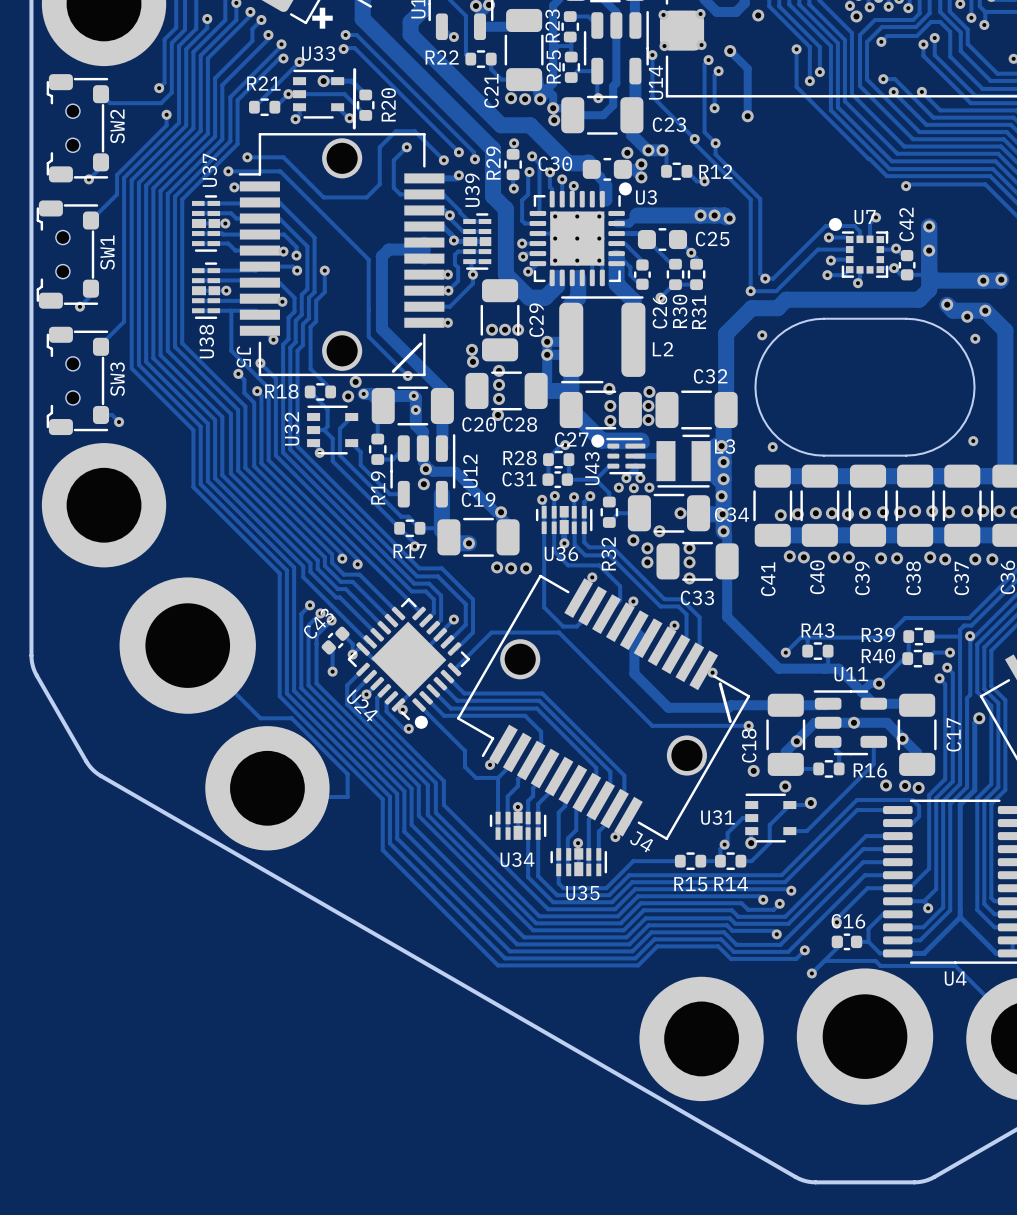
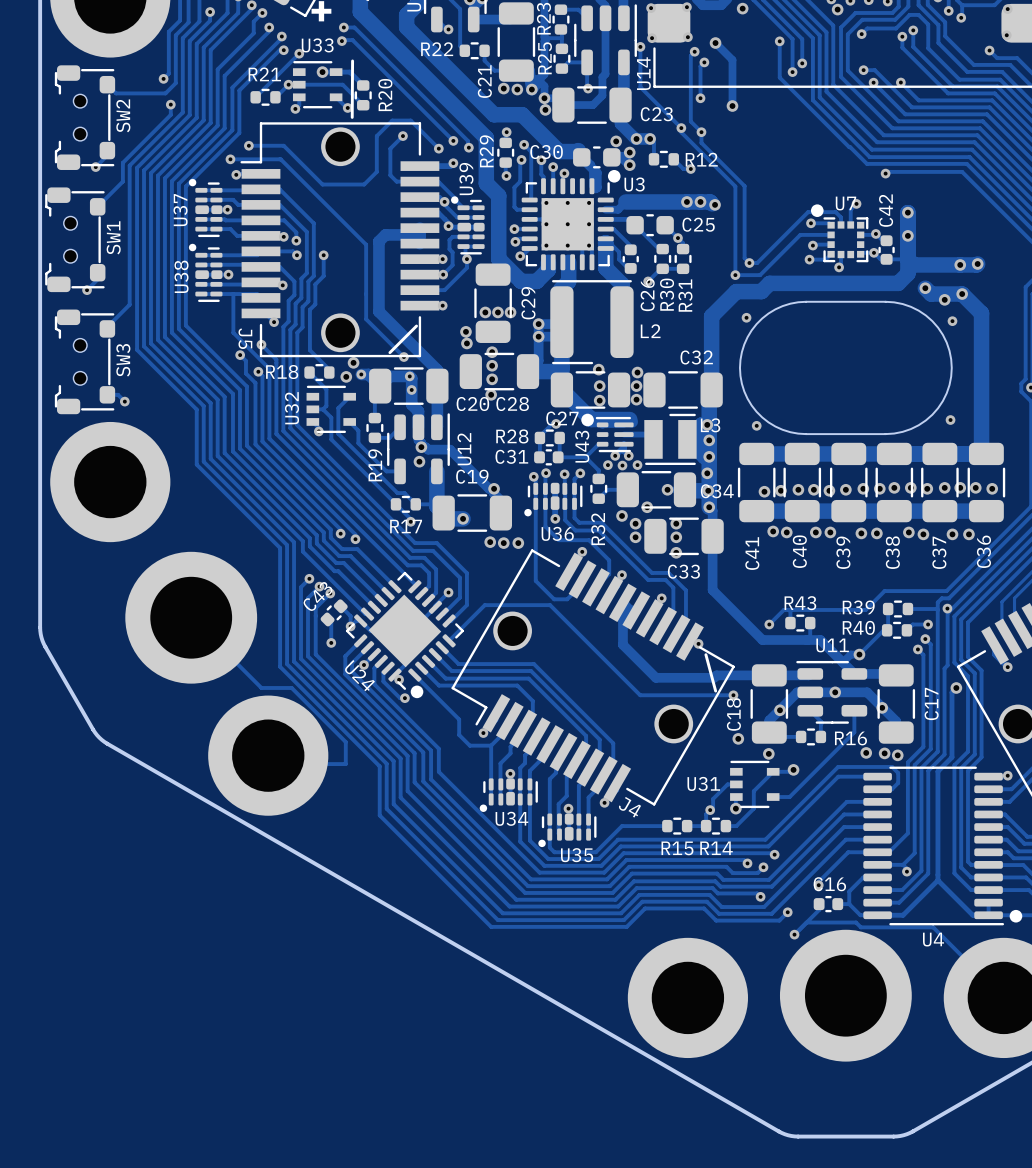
U37 name position: U37 (209, 170) -> U37 (180, 210)
U37 footprint: [192, 195, 221, 252] -> [188, 178, 223, 238]
U39 footprint: [463, 213, 492, 270] -> [451, 196, 485, 255]
U38 footprint: [192, 262, 221, 319] -> [188, 243, 223, 302]
U38 name position: U38 (206, 341) -> U38 (181, 276)
U36 footprint: [535, 505, 593, 535] -> [524, 482, 583, 517]
U34 footprint: [489, 811, 547, 840] -> [479, 778, 538, 812]
U35 footprint: [550, 848, 608, 877] -> [538, 813, 597, 848]

